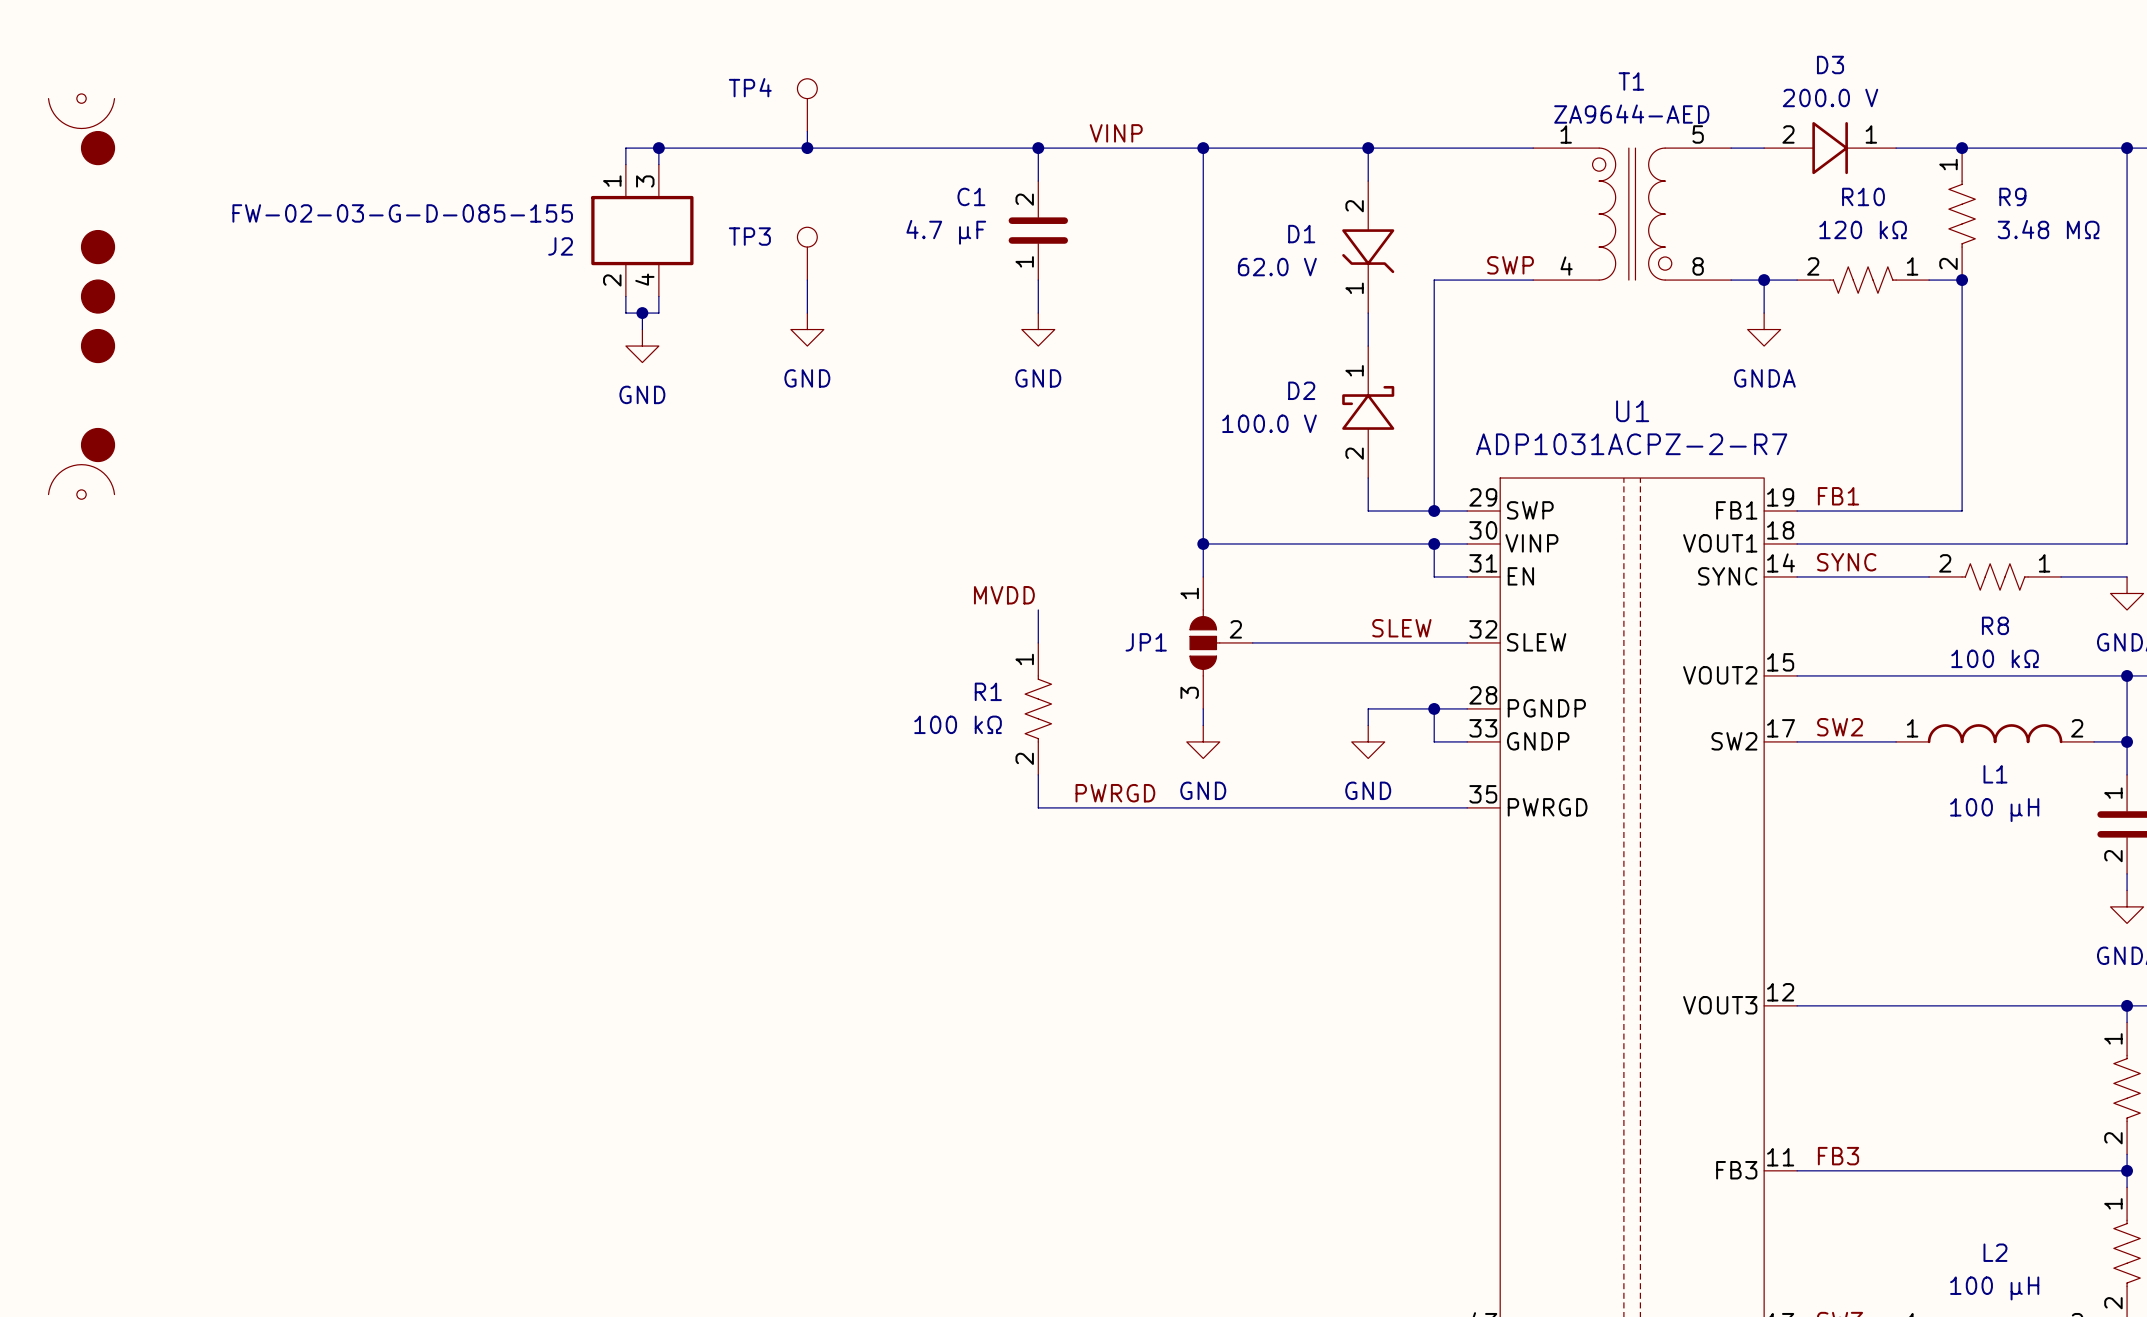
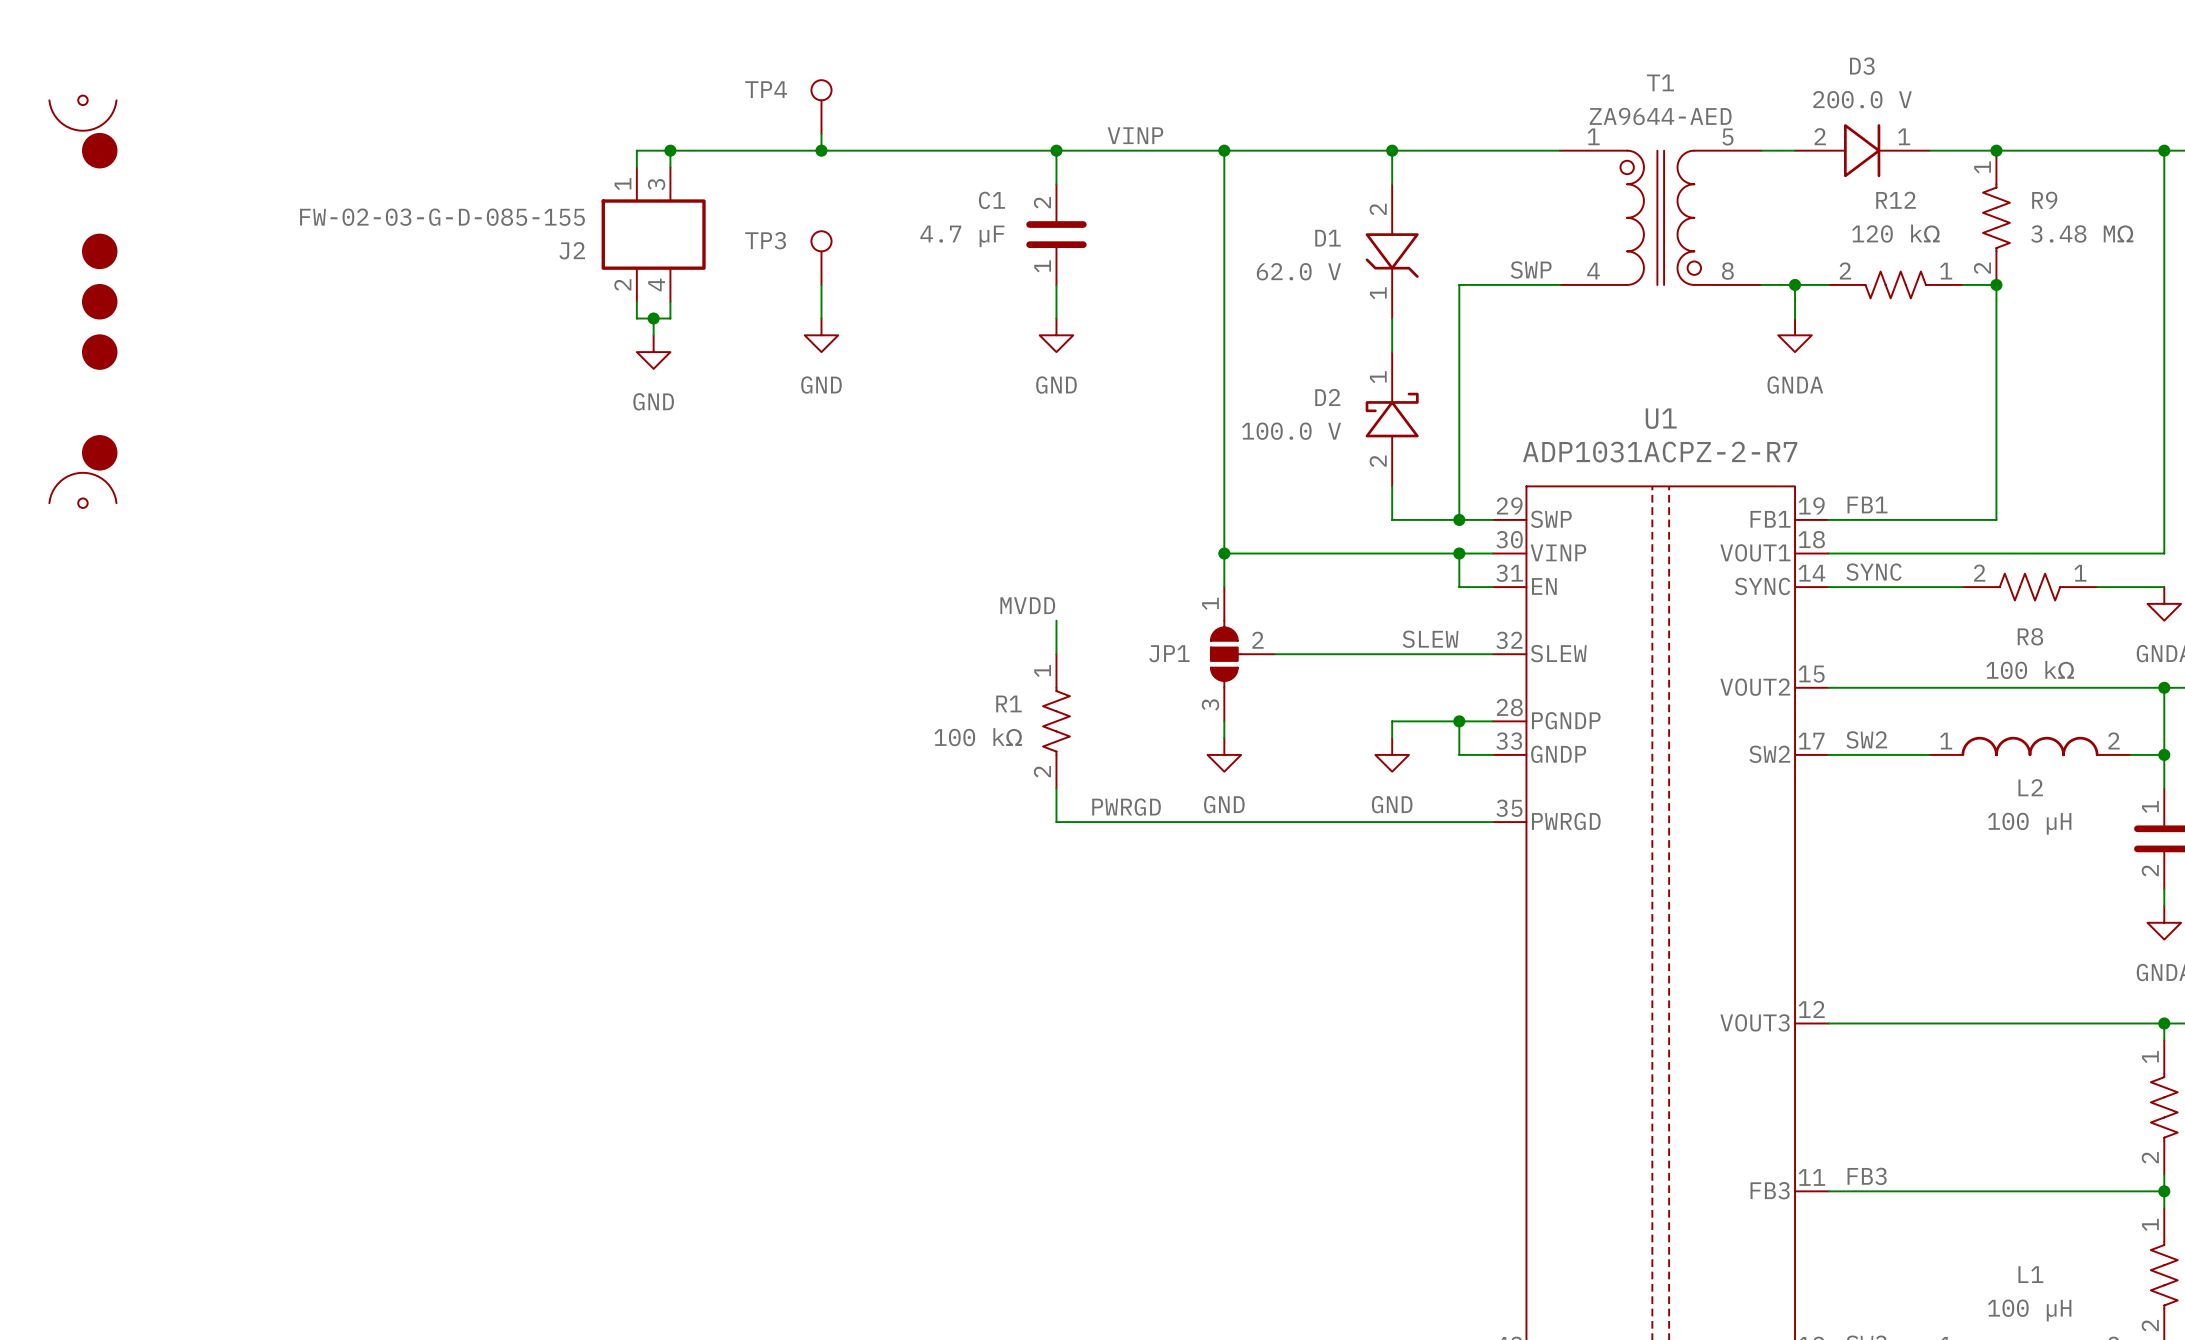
R10 name: R10 (1863, 196) -> R12 (1896, 200)
L1 name: L1 (1995, 774) -> L2 (2030, 787)
L2 name: L2 (1995, 1252) -> L1 (2030, 1274)

